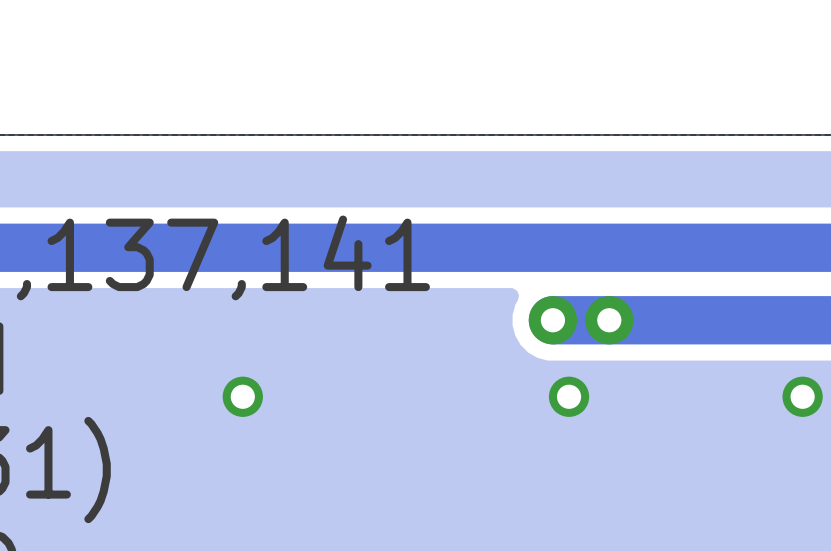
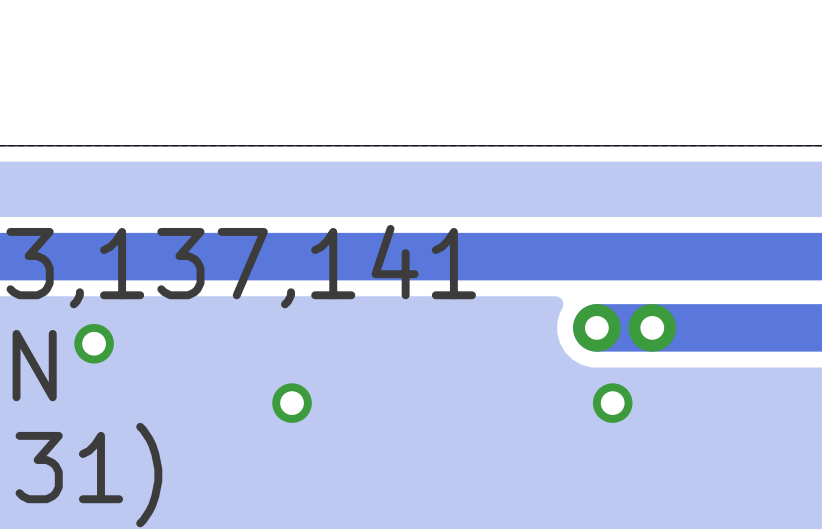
via: none -> (94, 343)

